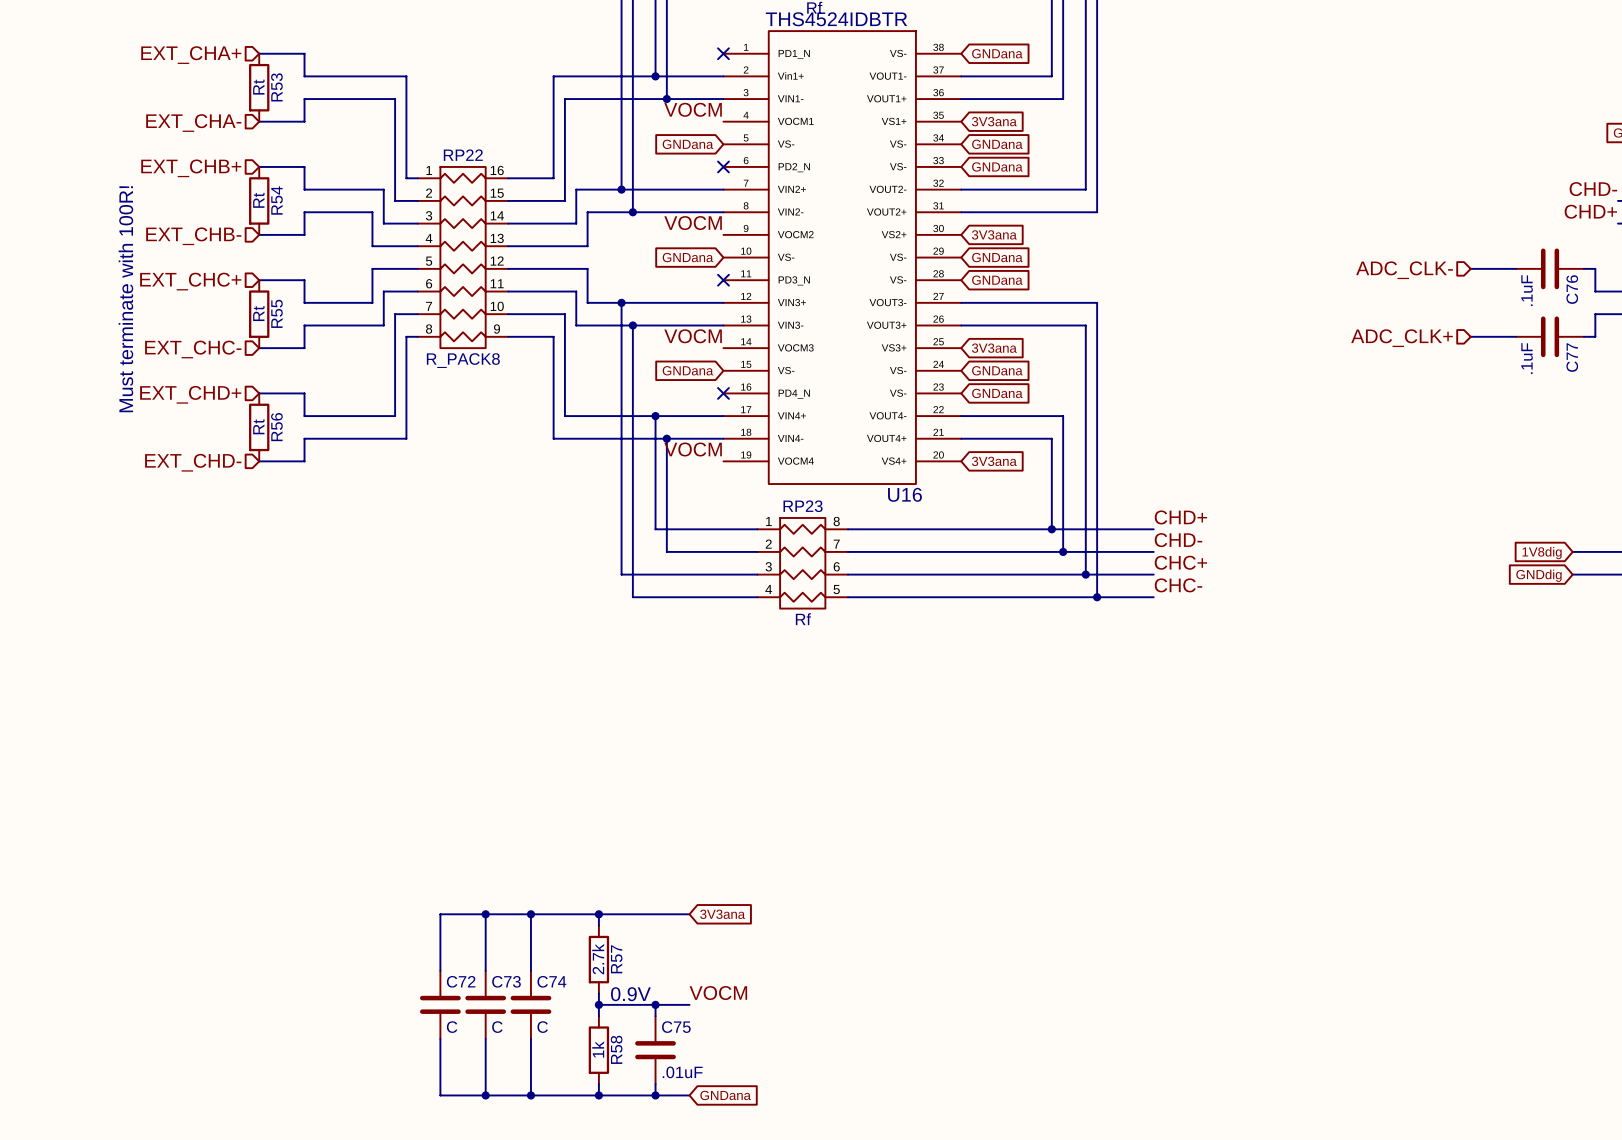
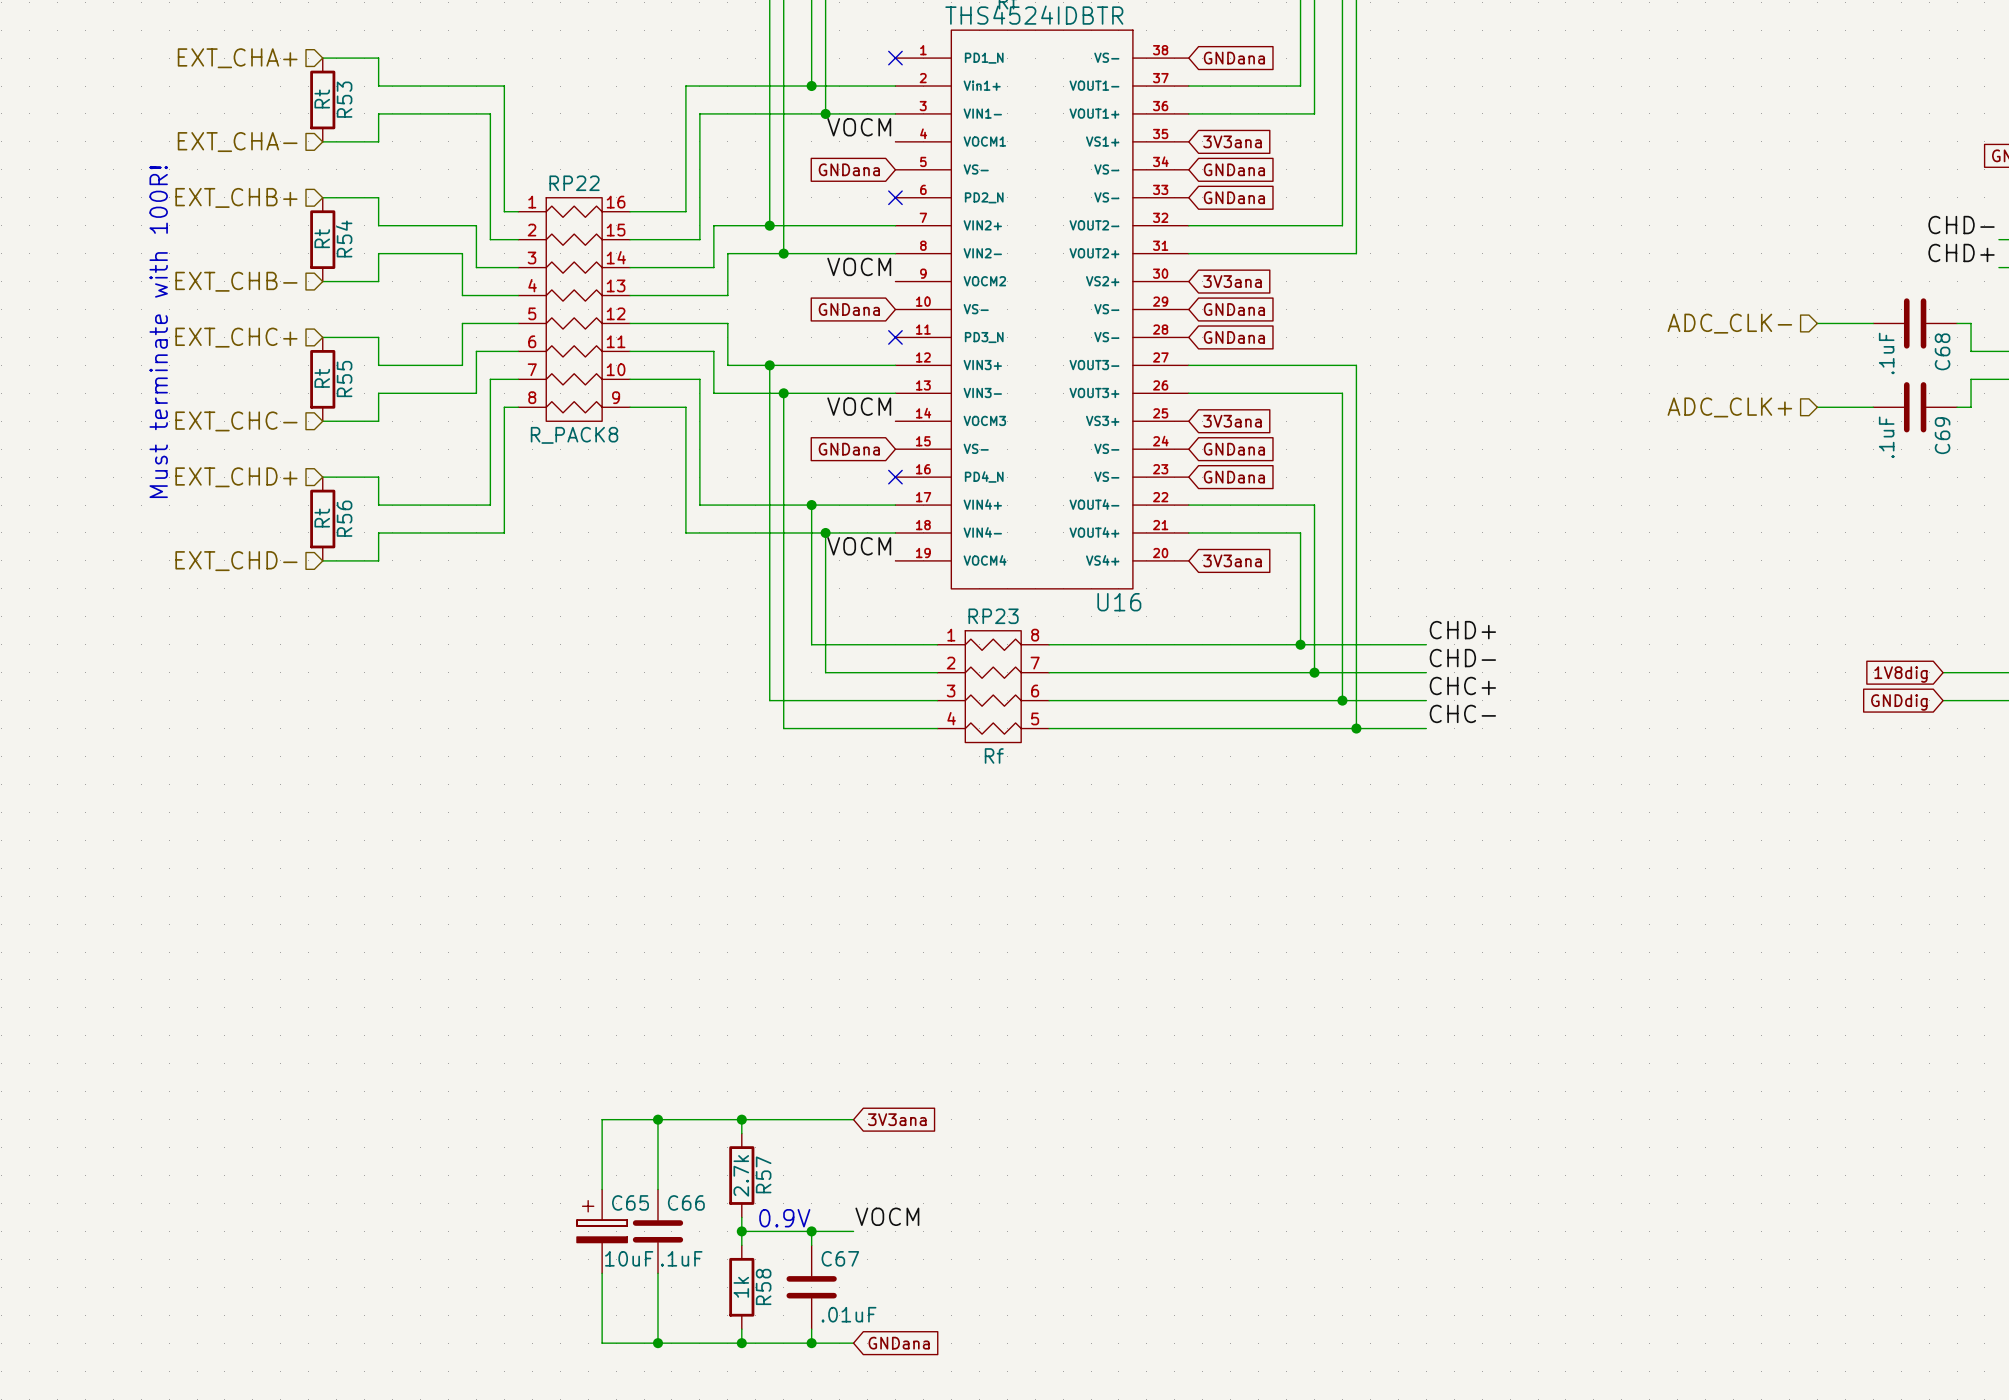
C76 name: C76 (1572, 289) -> C68 (1942, 351)
C77 name: C77 (1572, 357) -> C69 (1942, 435)
wire: (485, 914) (440, 914) (440, 970) -> none
junction: (485, 914) -> none
C74 name: C74 (551, 981) -> C66 (686, 1202)
C72: C (440, 1004) -> none
C73: C (485, 1004) -> none
C65: none -> 10uF (602, 1231)
C74 value: C (542, 1027) -> .1uF (681, 1258)
C75 name: C75 (676, 1027) -> C67 (840, 1258)
wire: (440, 1038) (440, 1095) (485, 1095) -> none
junction: (485, 1095) -> none

